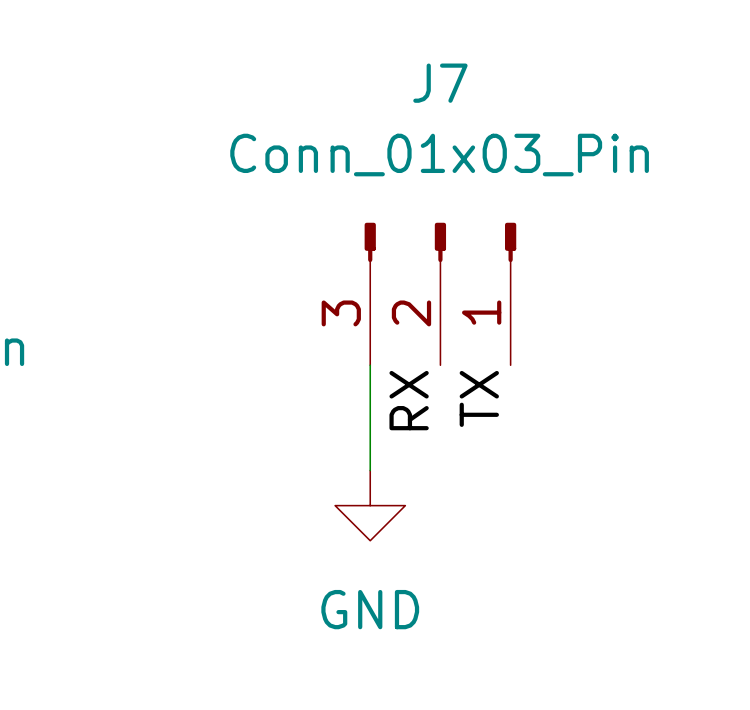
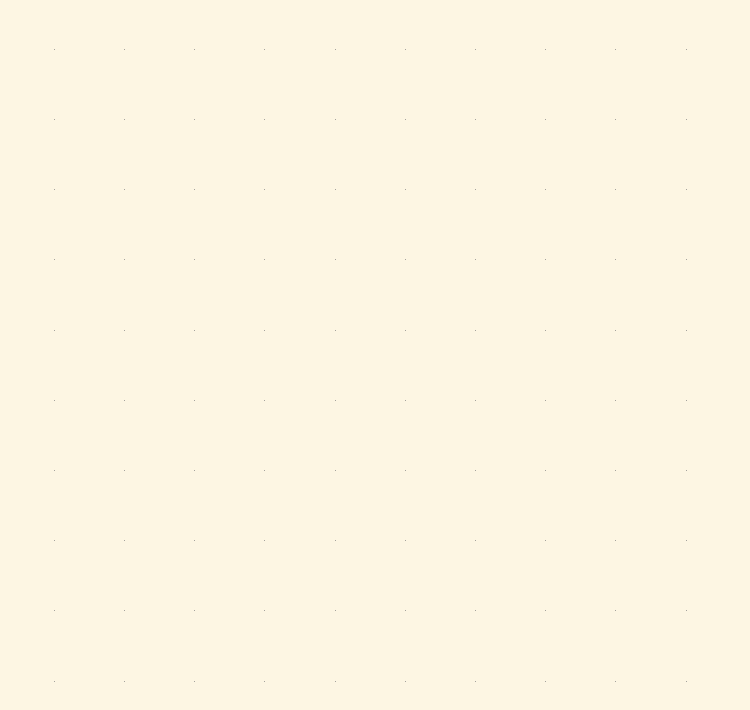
J7: Conn_01x03_Pin (440, 293) -> none
wire: (370, 365) (370, 470) -> none
label: TX (479, 398) -> none
label: RX (409, 400) -> none
power symbol: GND (370, 505) -> none

